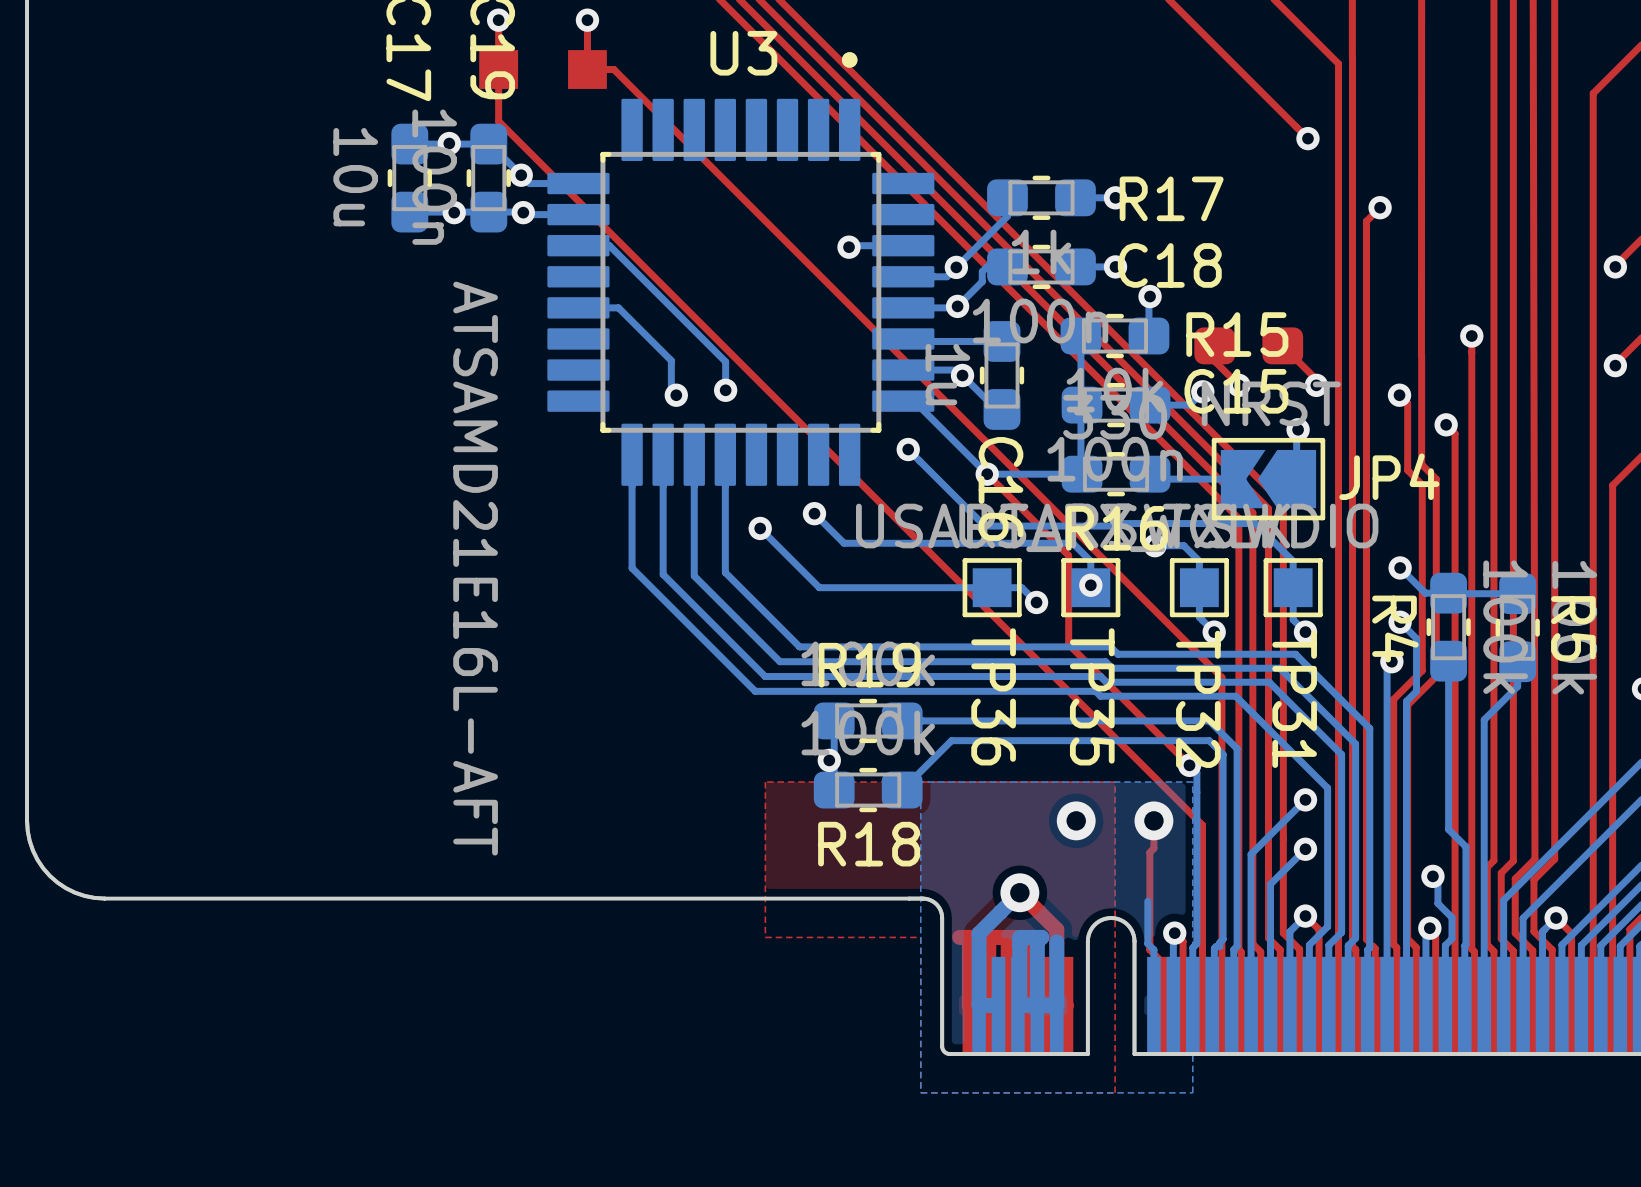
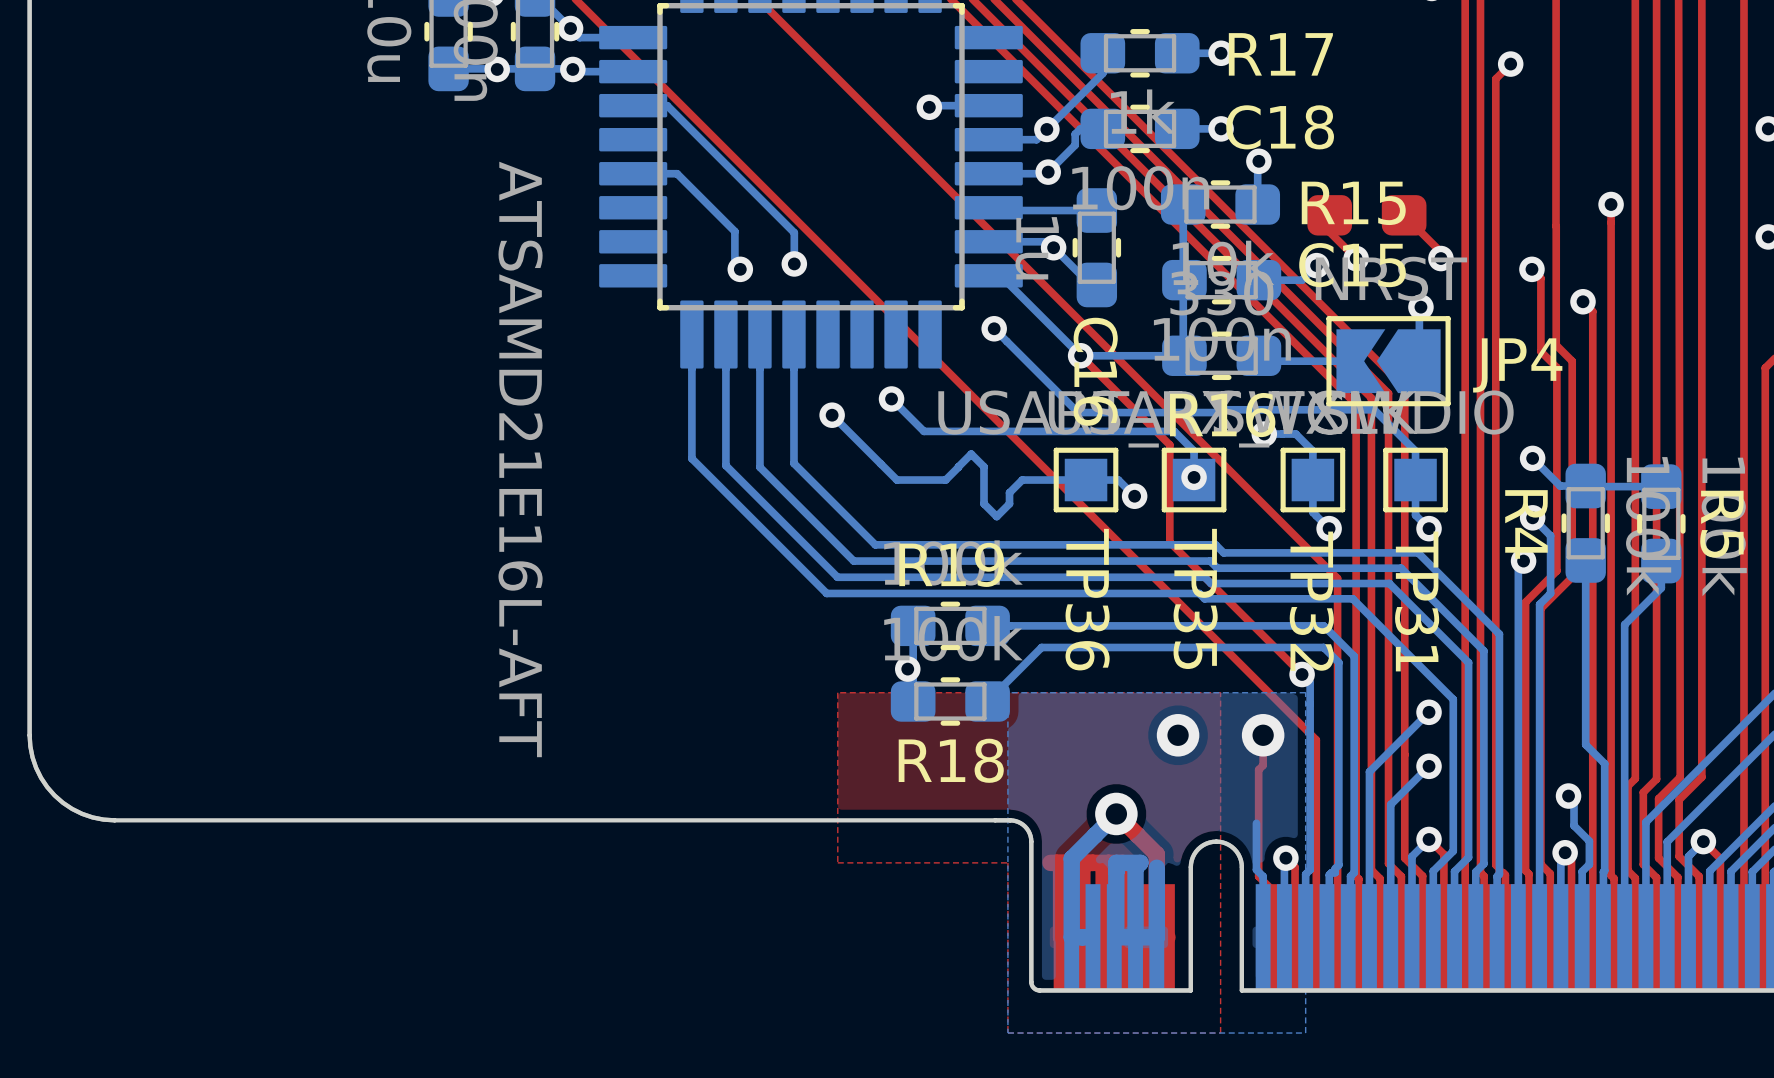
bottom track: none -> (958, 467) (945, 480)
bottom track: (933, 587) (863, 587) -> (1022, 480) (1009, 492) (1009, 503) (996, 516) (984, 503) (984, 466) (971, 454) (958, 466)

